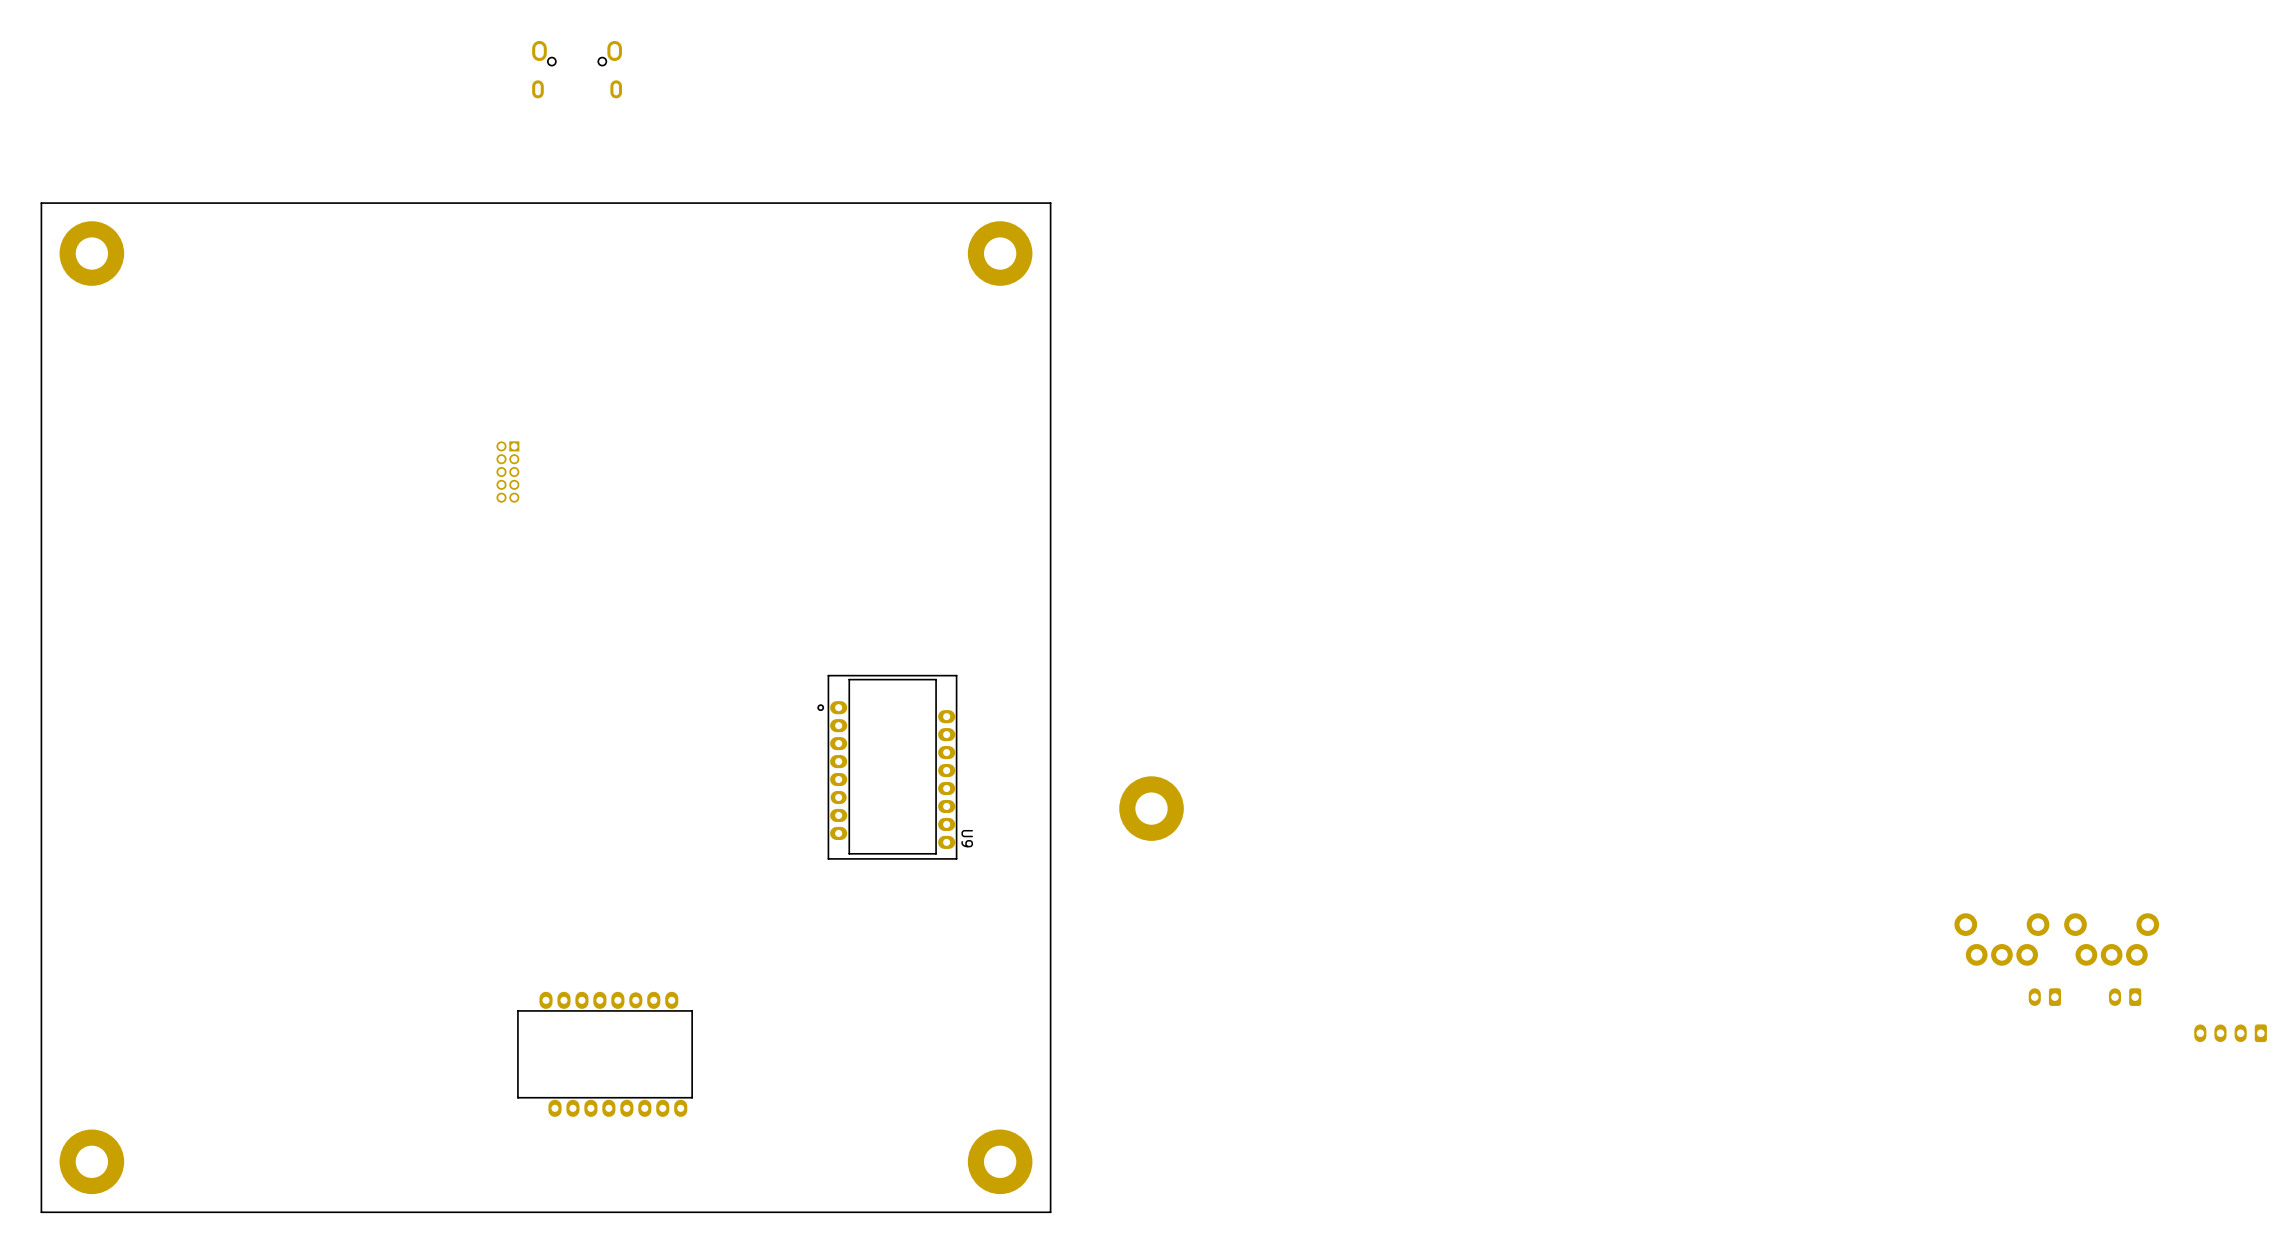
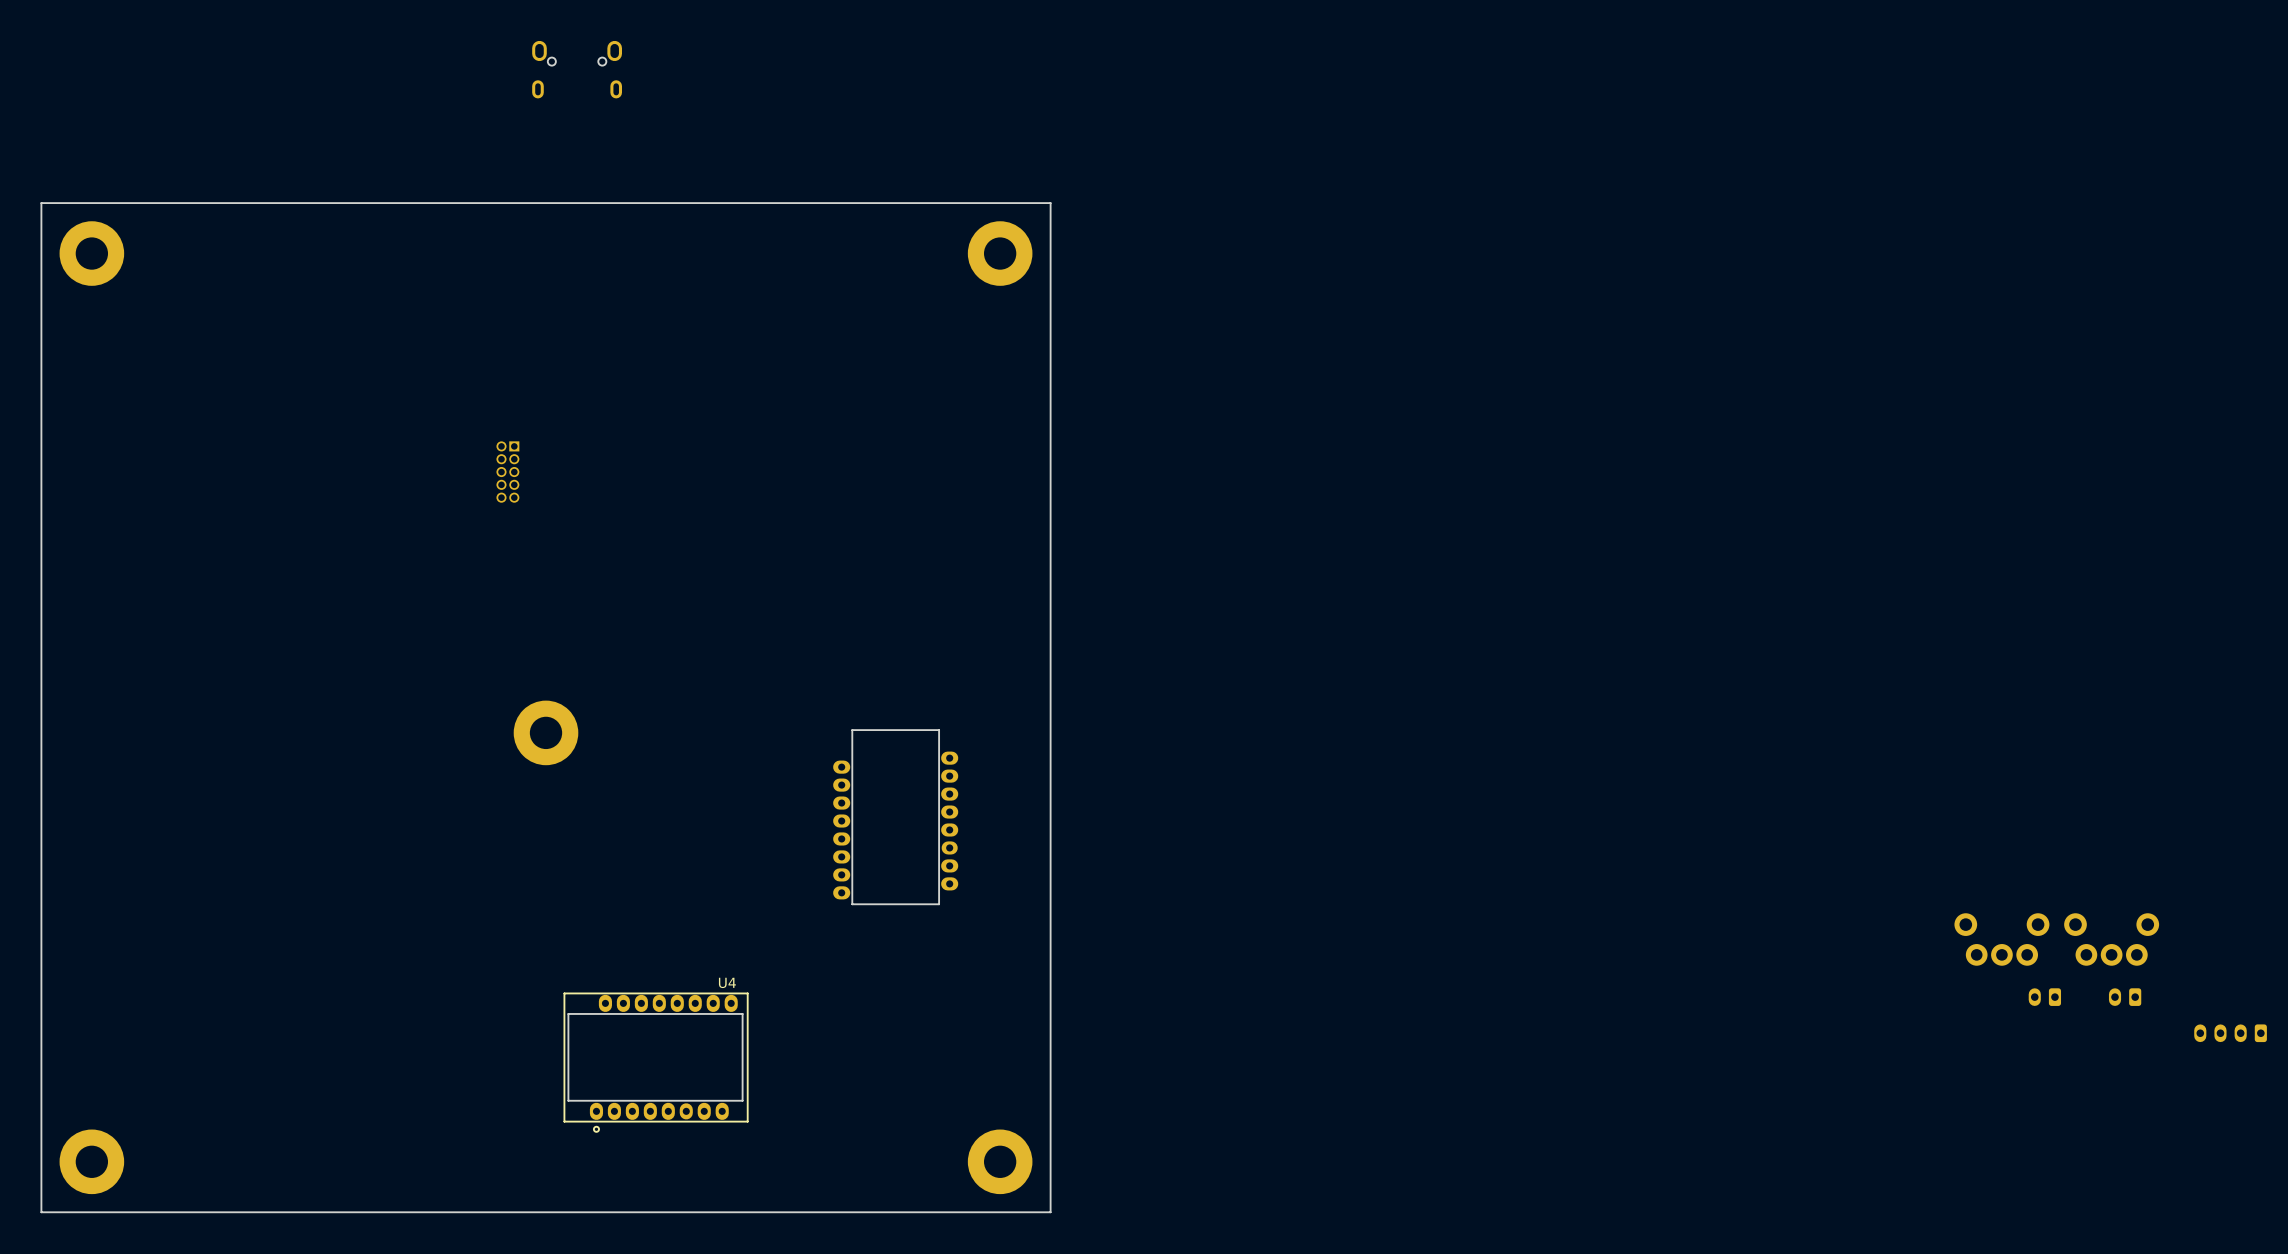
part: none -> (546, 732)
U9 side: bottom (887, 767) -> top (895, 817)
part: (1151, 808) -> none
U4 side: top (605, 1054) -> bottom (656, 1062)

